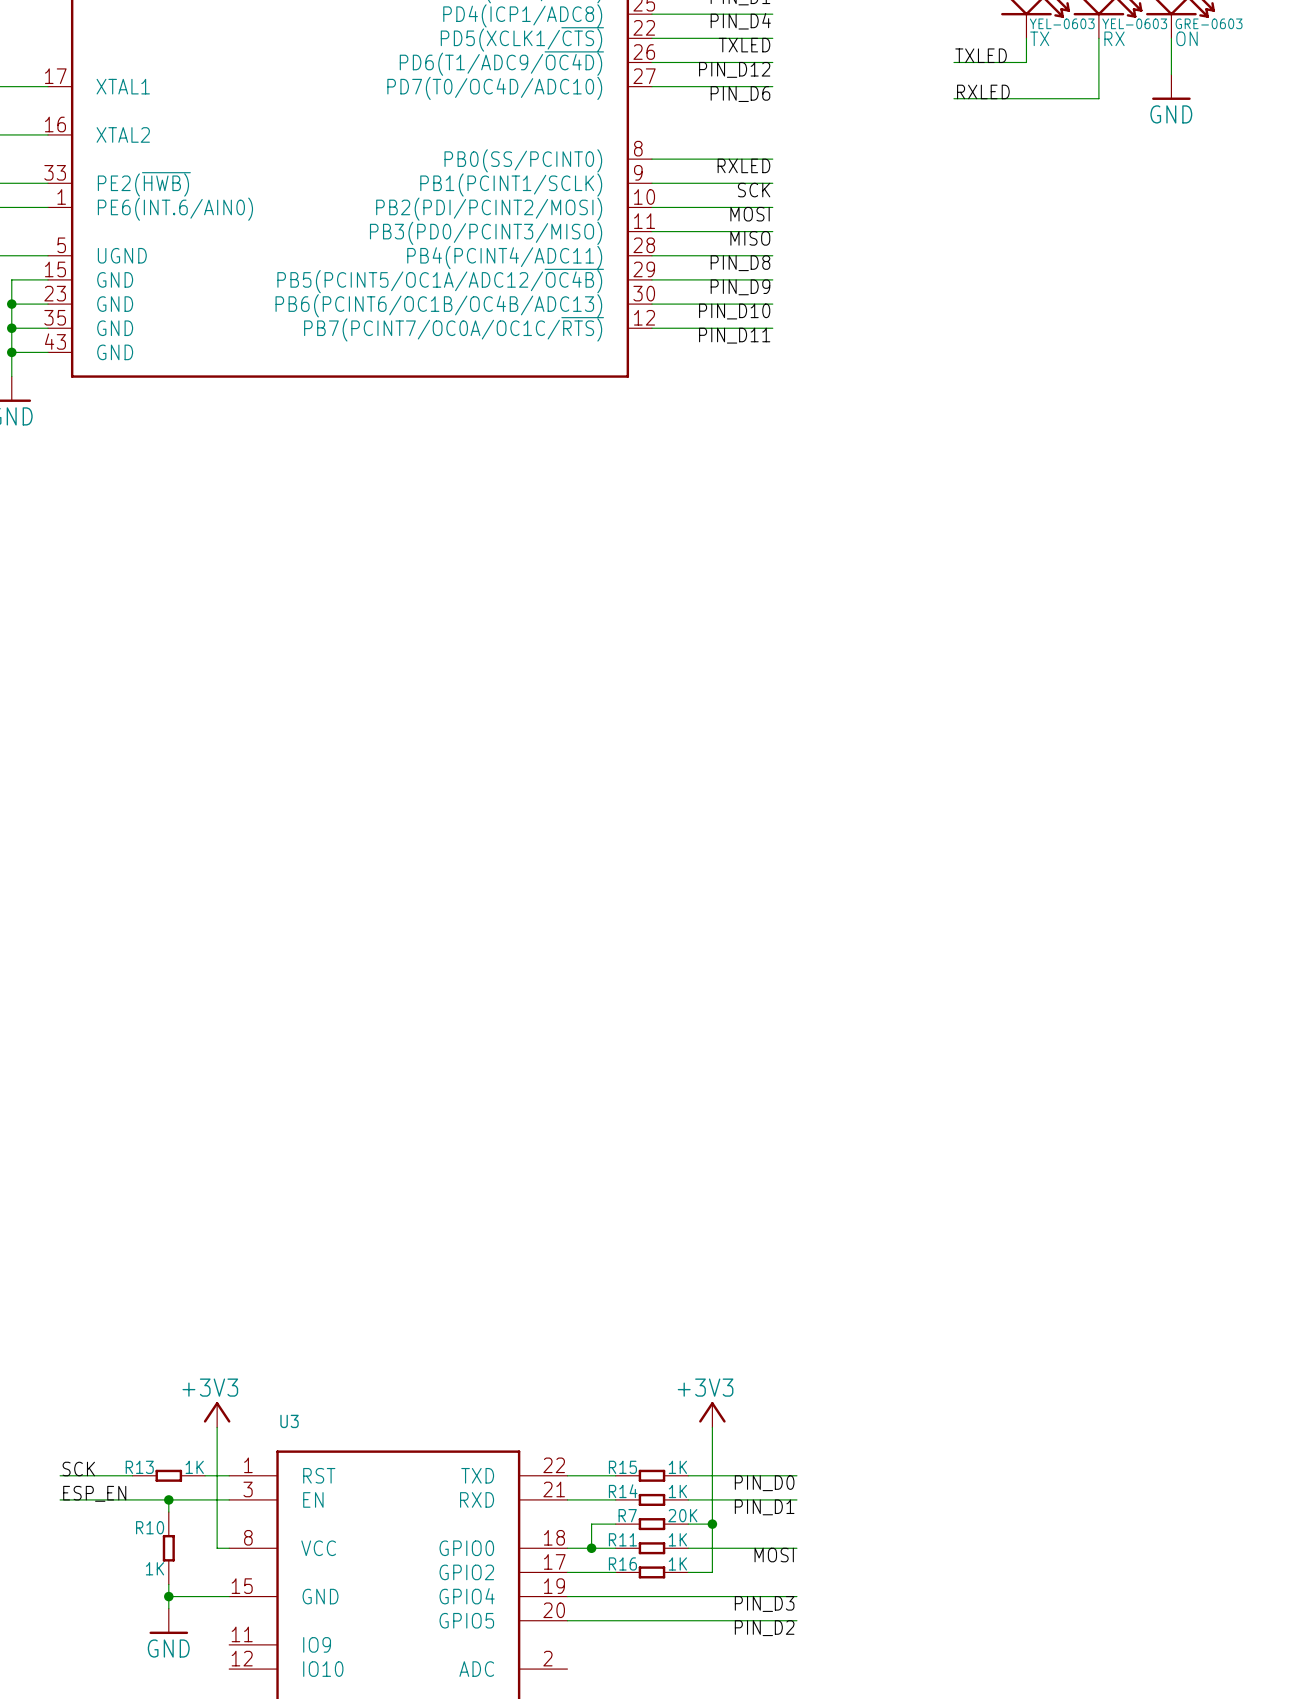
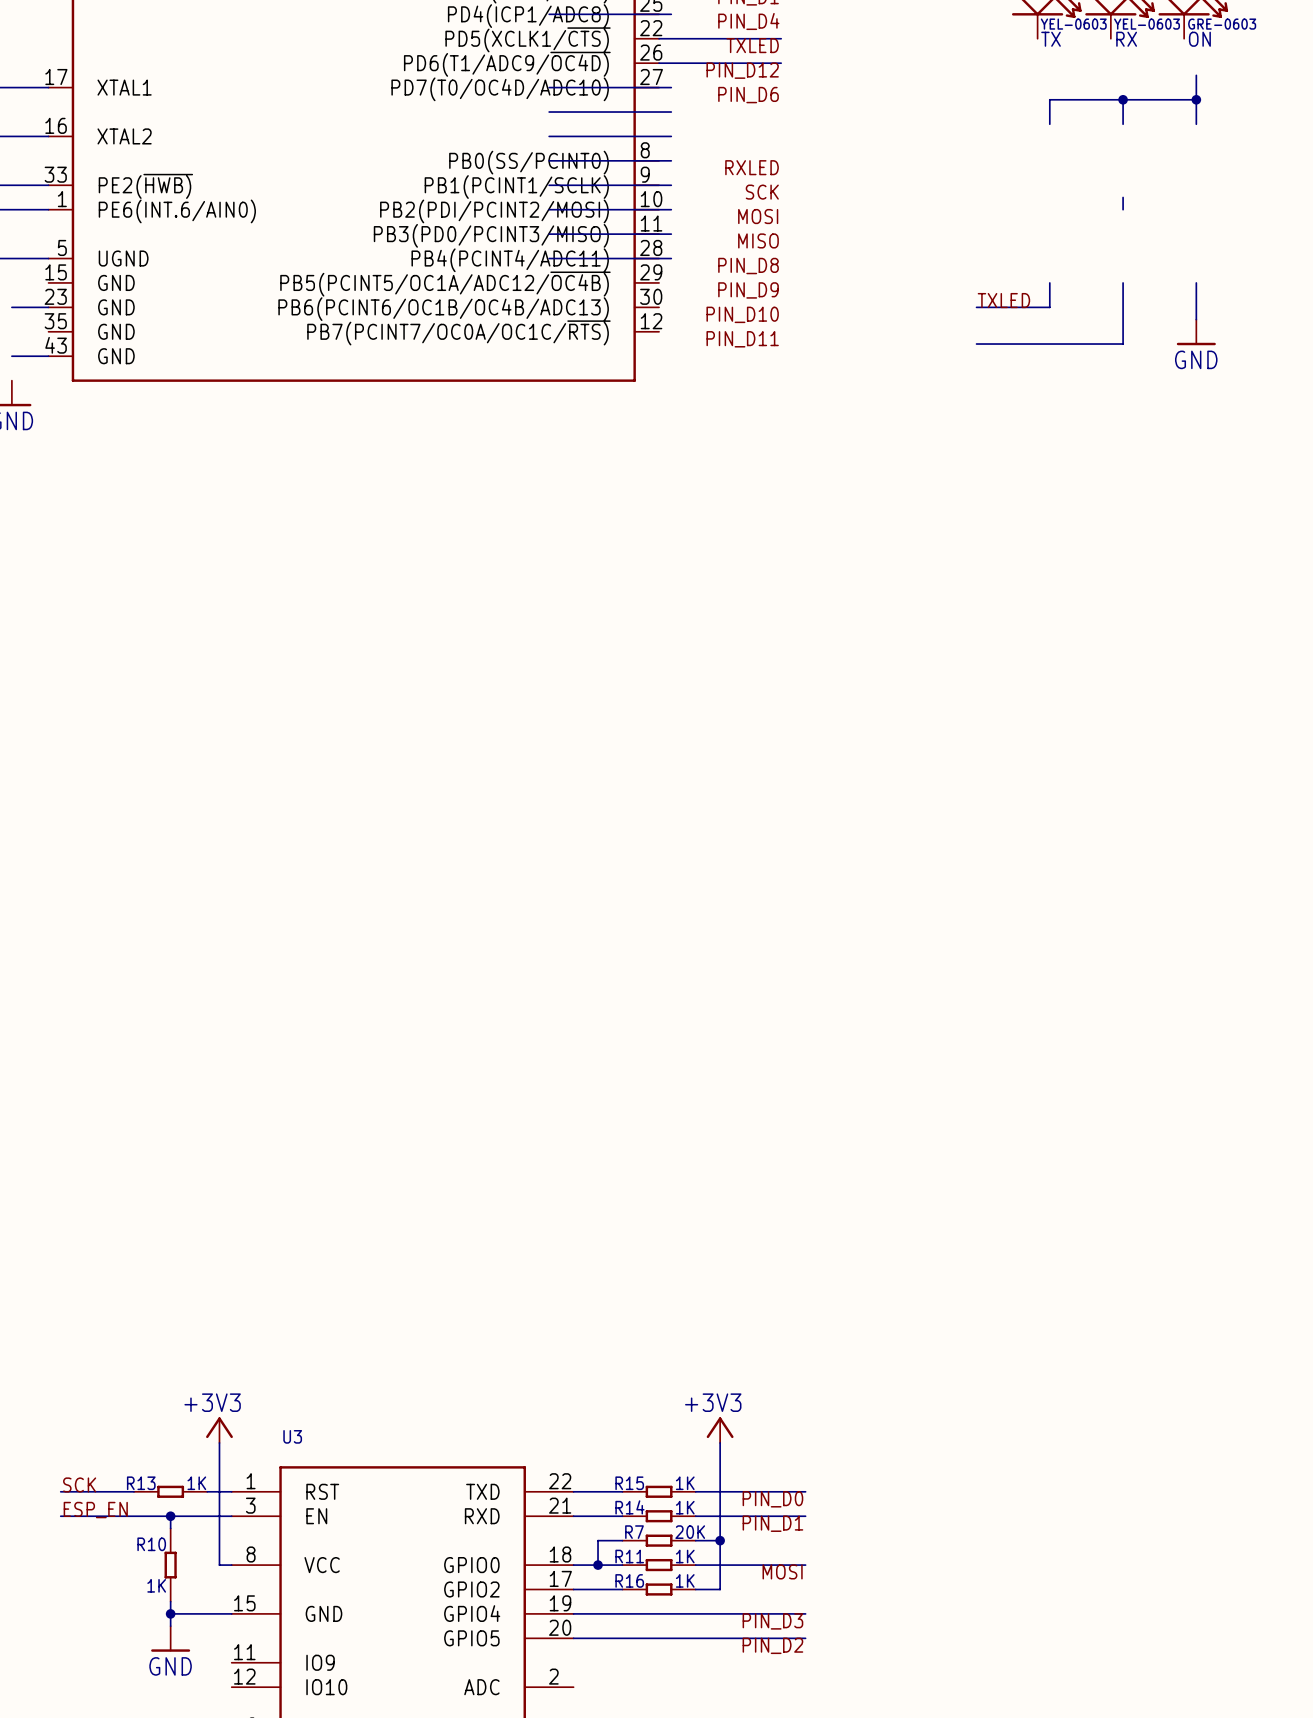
wire: (664, 14) (772, 14) -> (549, 14) (659, 14)
wire: (1026, 38) (1026, 62) (953, 62) -> none
wire: (1098, 38) (1098, 98) -> (1196, 99) (1110, 99)
wire: (1171, 38) (1171, 74) -> none
label: TXLED (981, 55) -> none
wire: none -> (1196, 75) (1196, 124)
wire: (664, 86) (772, 86) -> (549, 87) (659, 87)
power symbol: GND (1171, 87) -> none
label: RXLED (983, 91) -> none
wire: (953, 98) (1038, 98) -> (1049, 124) (1049, 99)
wire: none -> (1123, 99) (1123, 124)
junction: none -> (1123, 99)
junction: none -> (1196, 99)
wire: (664, 159) (772, 159) -> (549, 160) (659, 160)
wire: (664, 183) (772, 183) -> (549, 185) (659, 185)
wire: none -> (1123, 197) (1123, 209)
wire: (664, 207) (772, 207) -> (549, 209) (659, 209)
wire: (664, 231) (772, 231) -> (549, 234) (659, 234)
wire: (664, 255) (772, 255) -> (549, 258) (659, 258)
wire: (48, 279) (11, 279) (11, 376) -> none
wire: (651, 279) (772, 279) -> none
wire: none -> (1049, 282) (1049, 307) (976, 307)
wire: none -> (1123, 282) (1123, 344) (976, 344)
wire: none -> (1196, 282) (1196, 319)
label: none -> TXLED (1003, 300)
junction: (11, 304) -> none
wire: (651, 304) (772, 304) -> (549, 112) (671, 112)
wire: (11, 328) (48, 328) -> none
junction: (11, 328) -> none
wire: (651, 328) (772, 328) -> (549, 136) (671, 136)
power symbol: none -> GND (1196, 332)
junction: (11, 352) -> none

